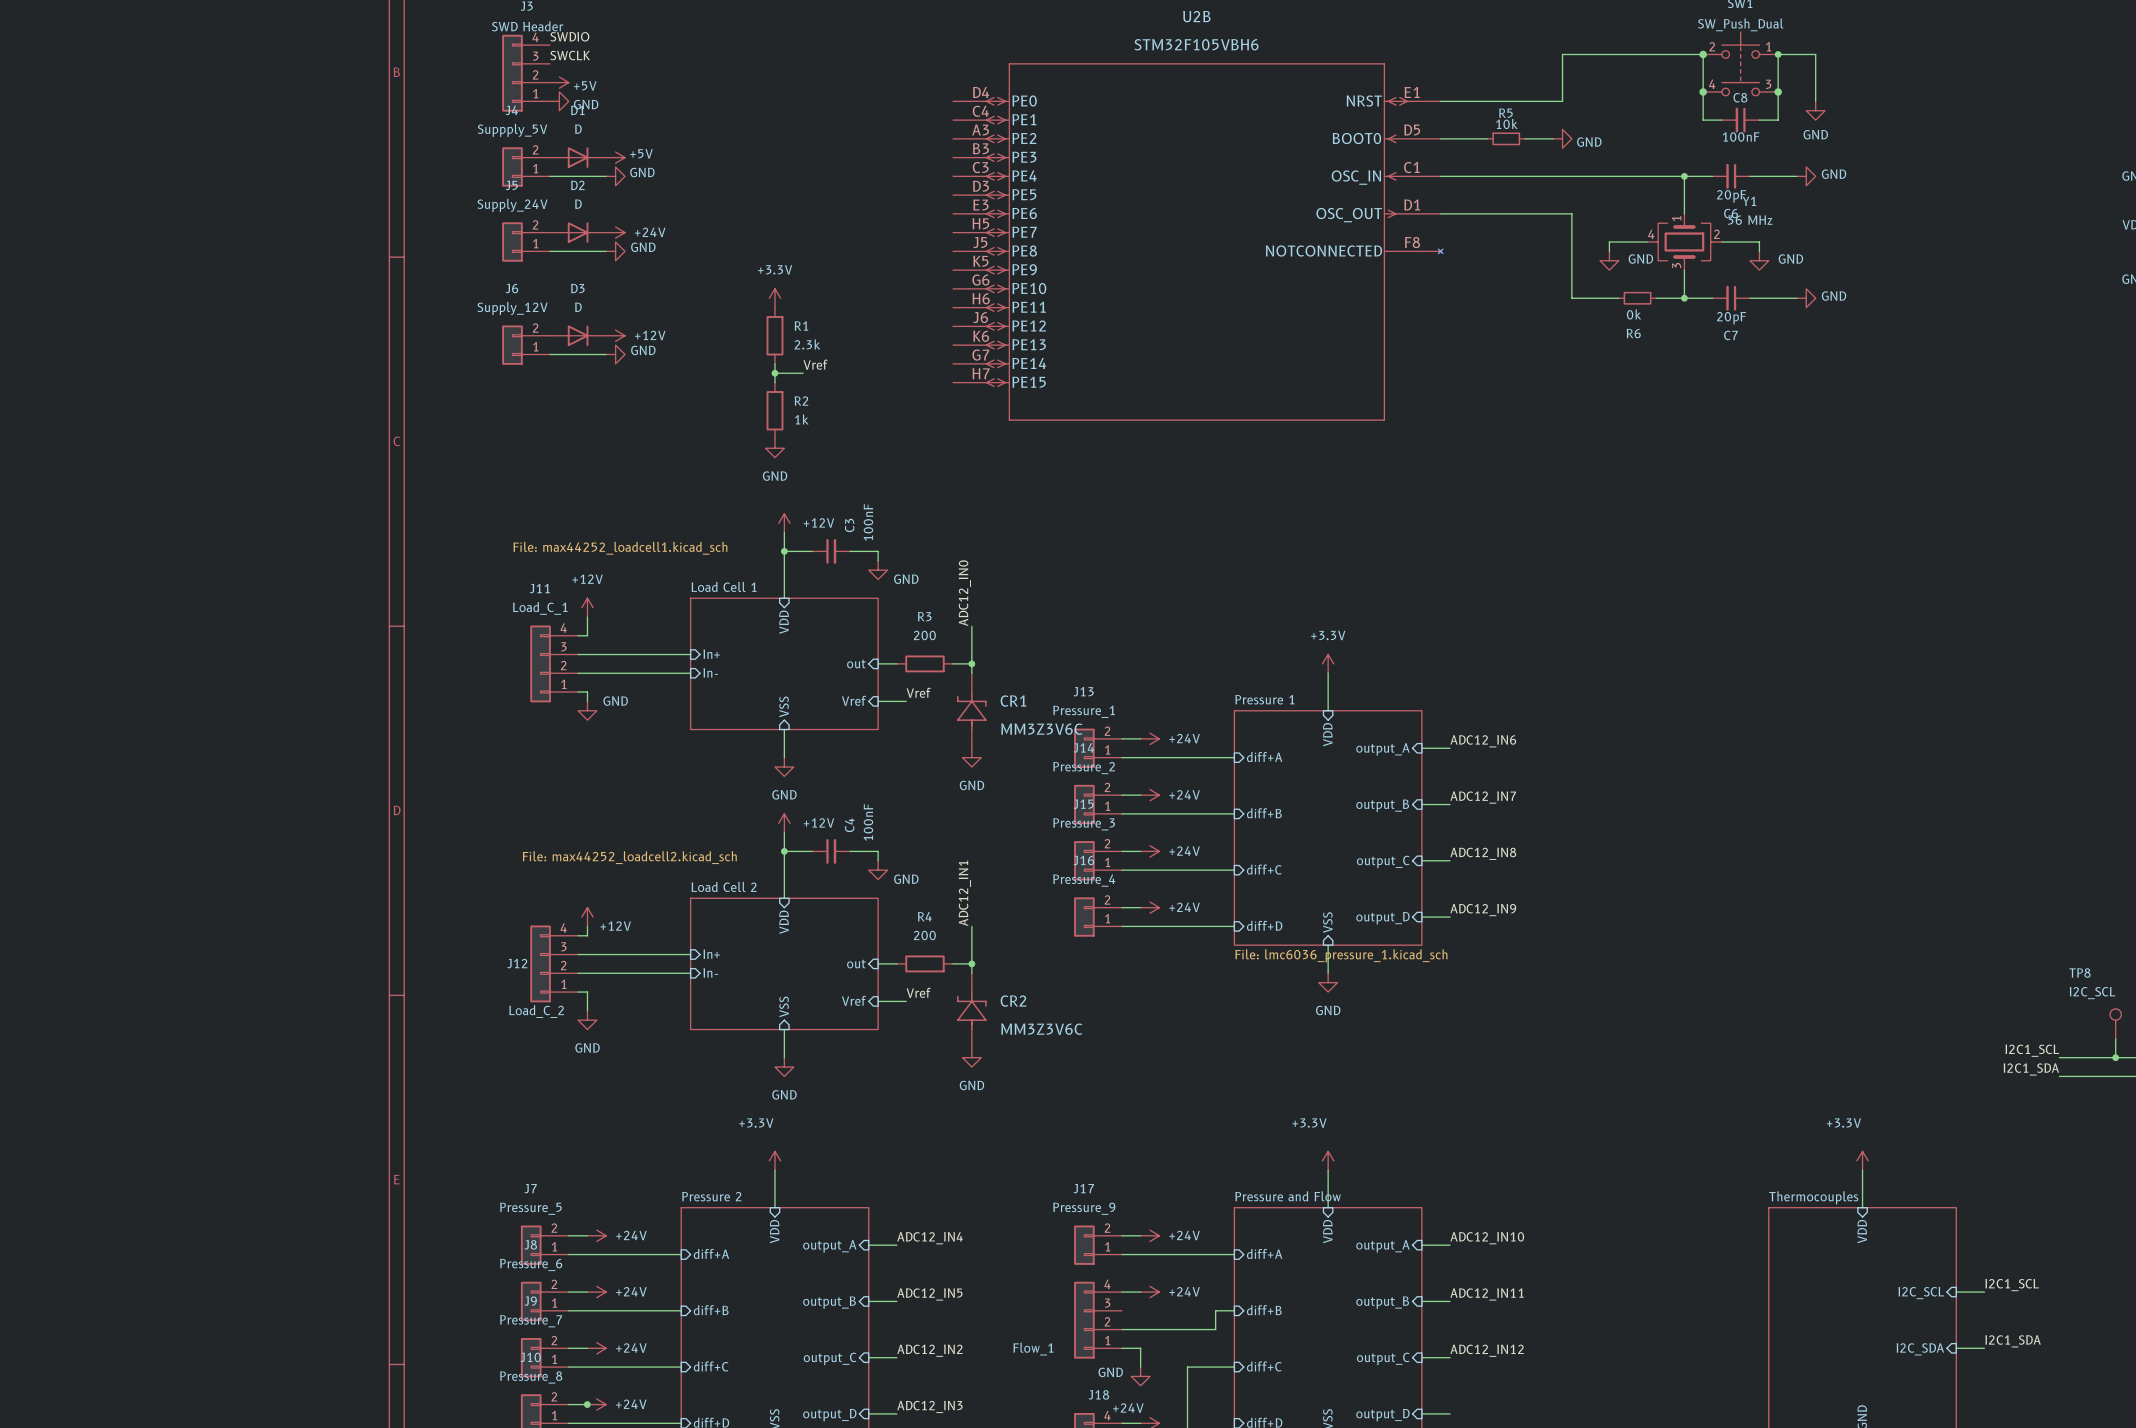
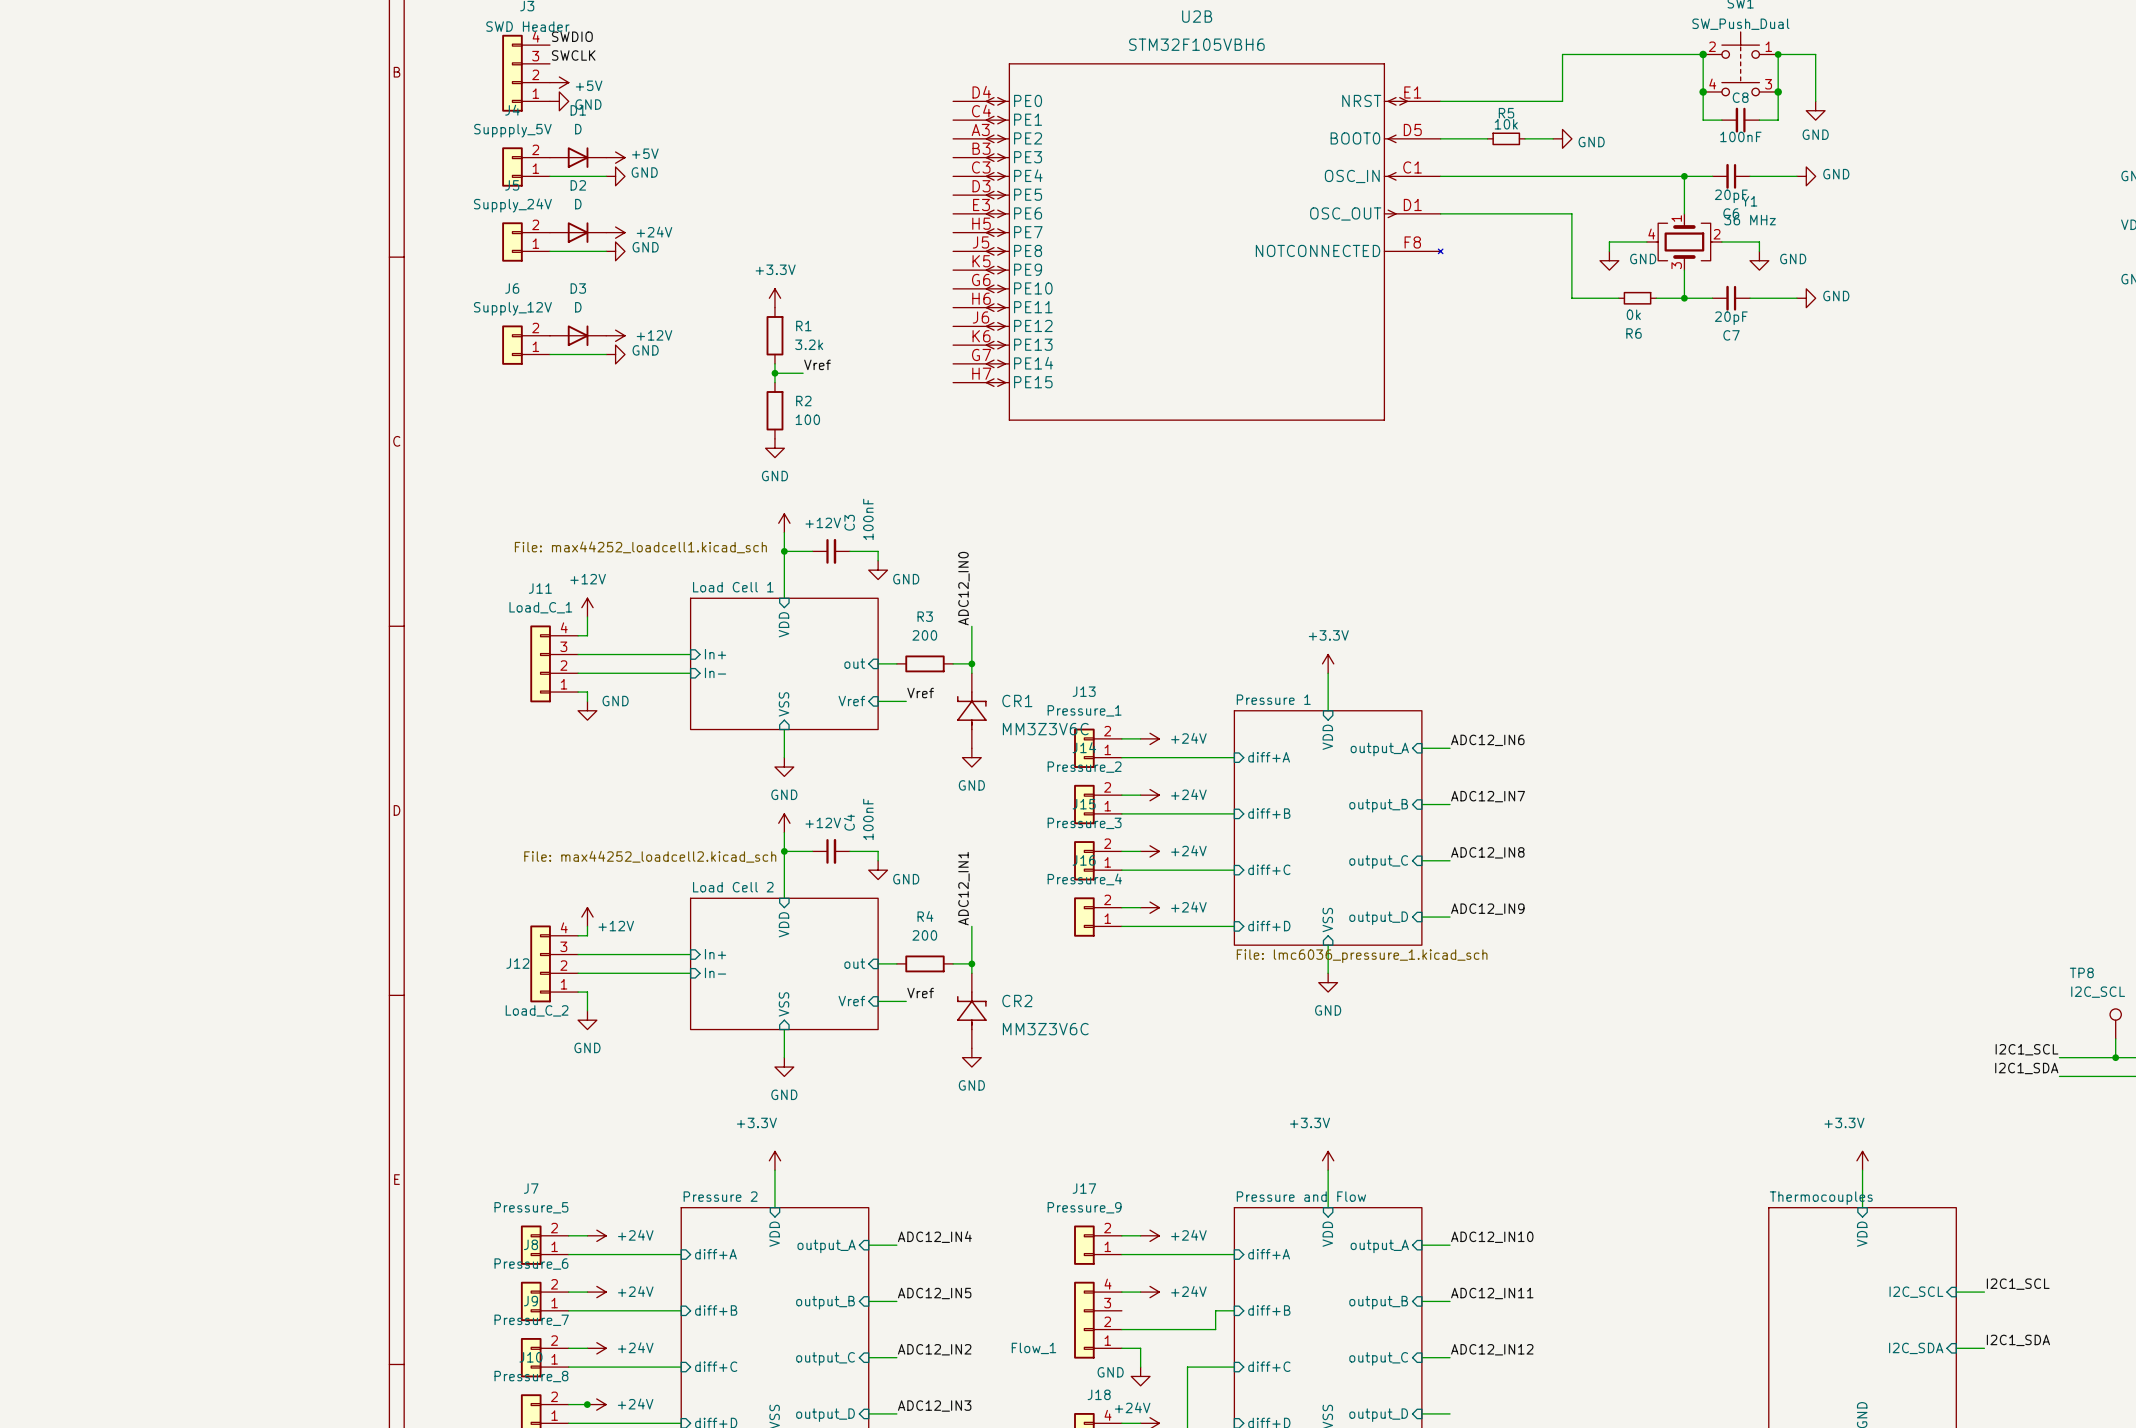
R1 value: 2.3k (807, 344) -> 3.2k (809, 344)
R2 value: 1k (801, 419) -> 100 (807, 419)

